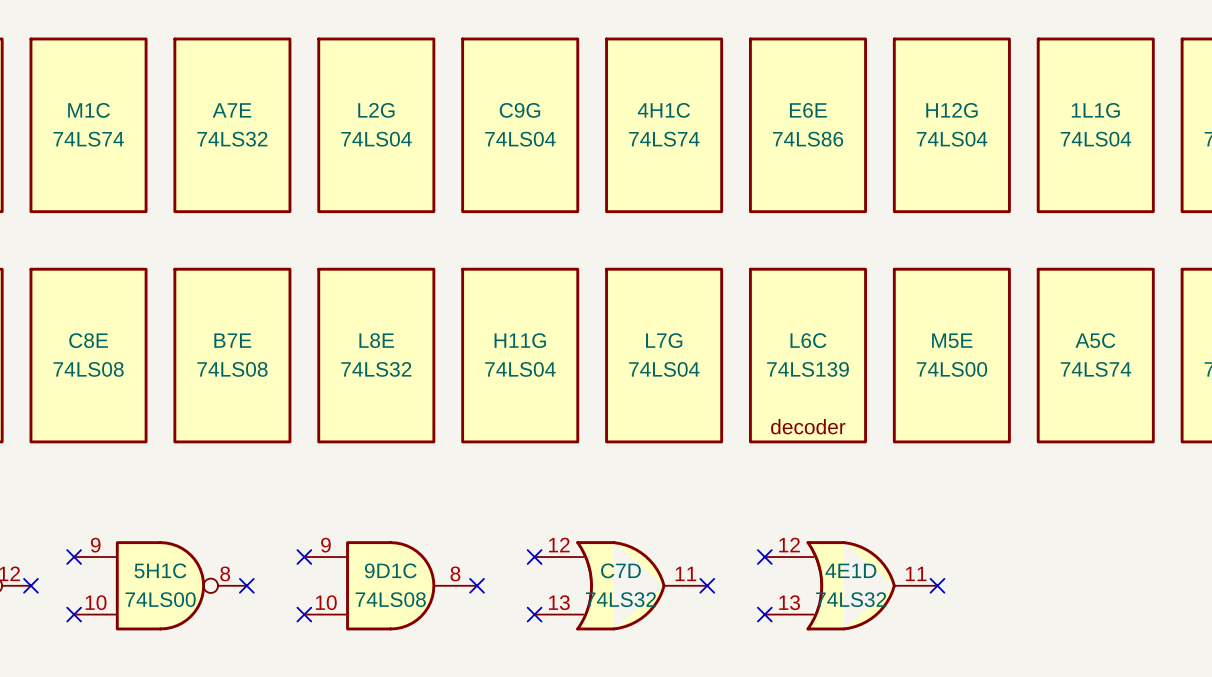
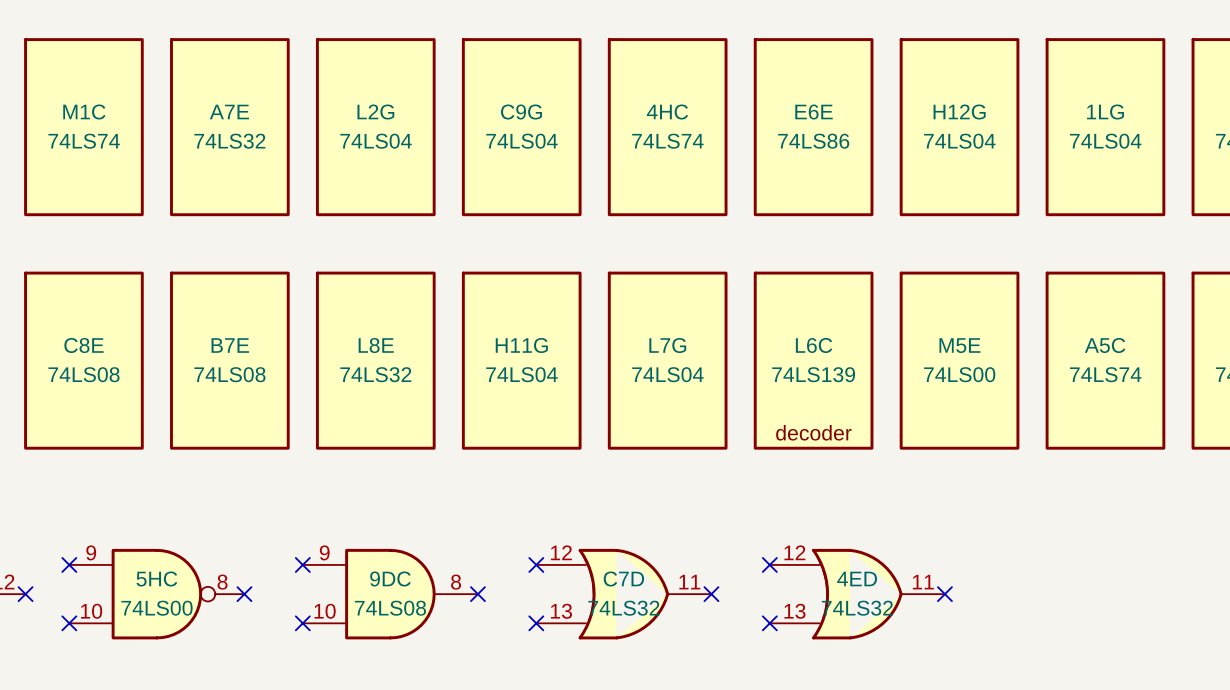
4H1C name: 4H1C (663, 110) -> 4HC (667, 112)
1L1G name: 1L1G (1095, 110) -> 1LG (1105, 112)
5H1C name: 5H1C (160, 570) -> 5HC (156, 579)
9D1C name: 9D1C (390, 570) -> 9DC (390, 579)
4E1D name: 4E1D (850, 570) -> 4ED (857, 579)

